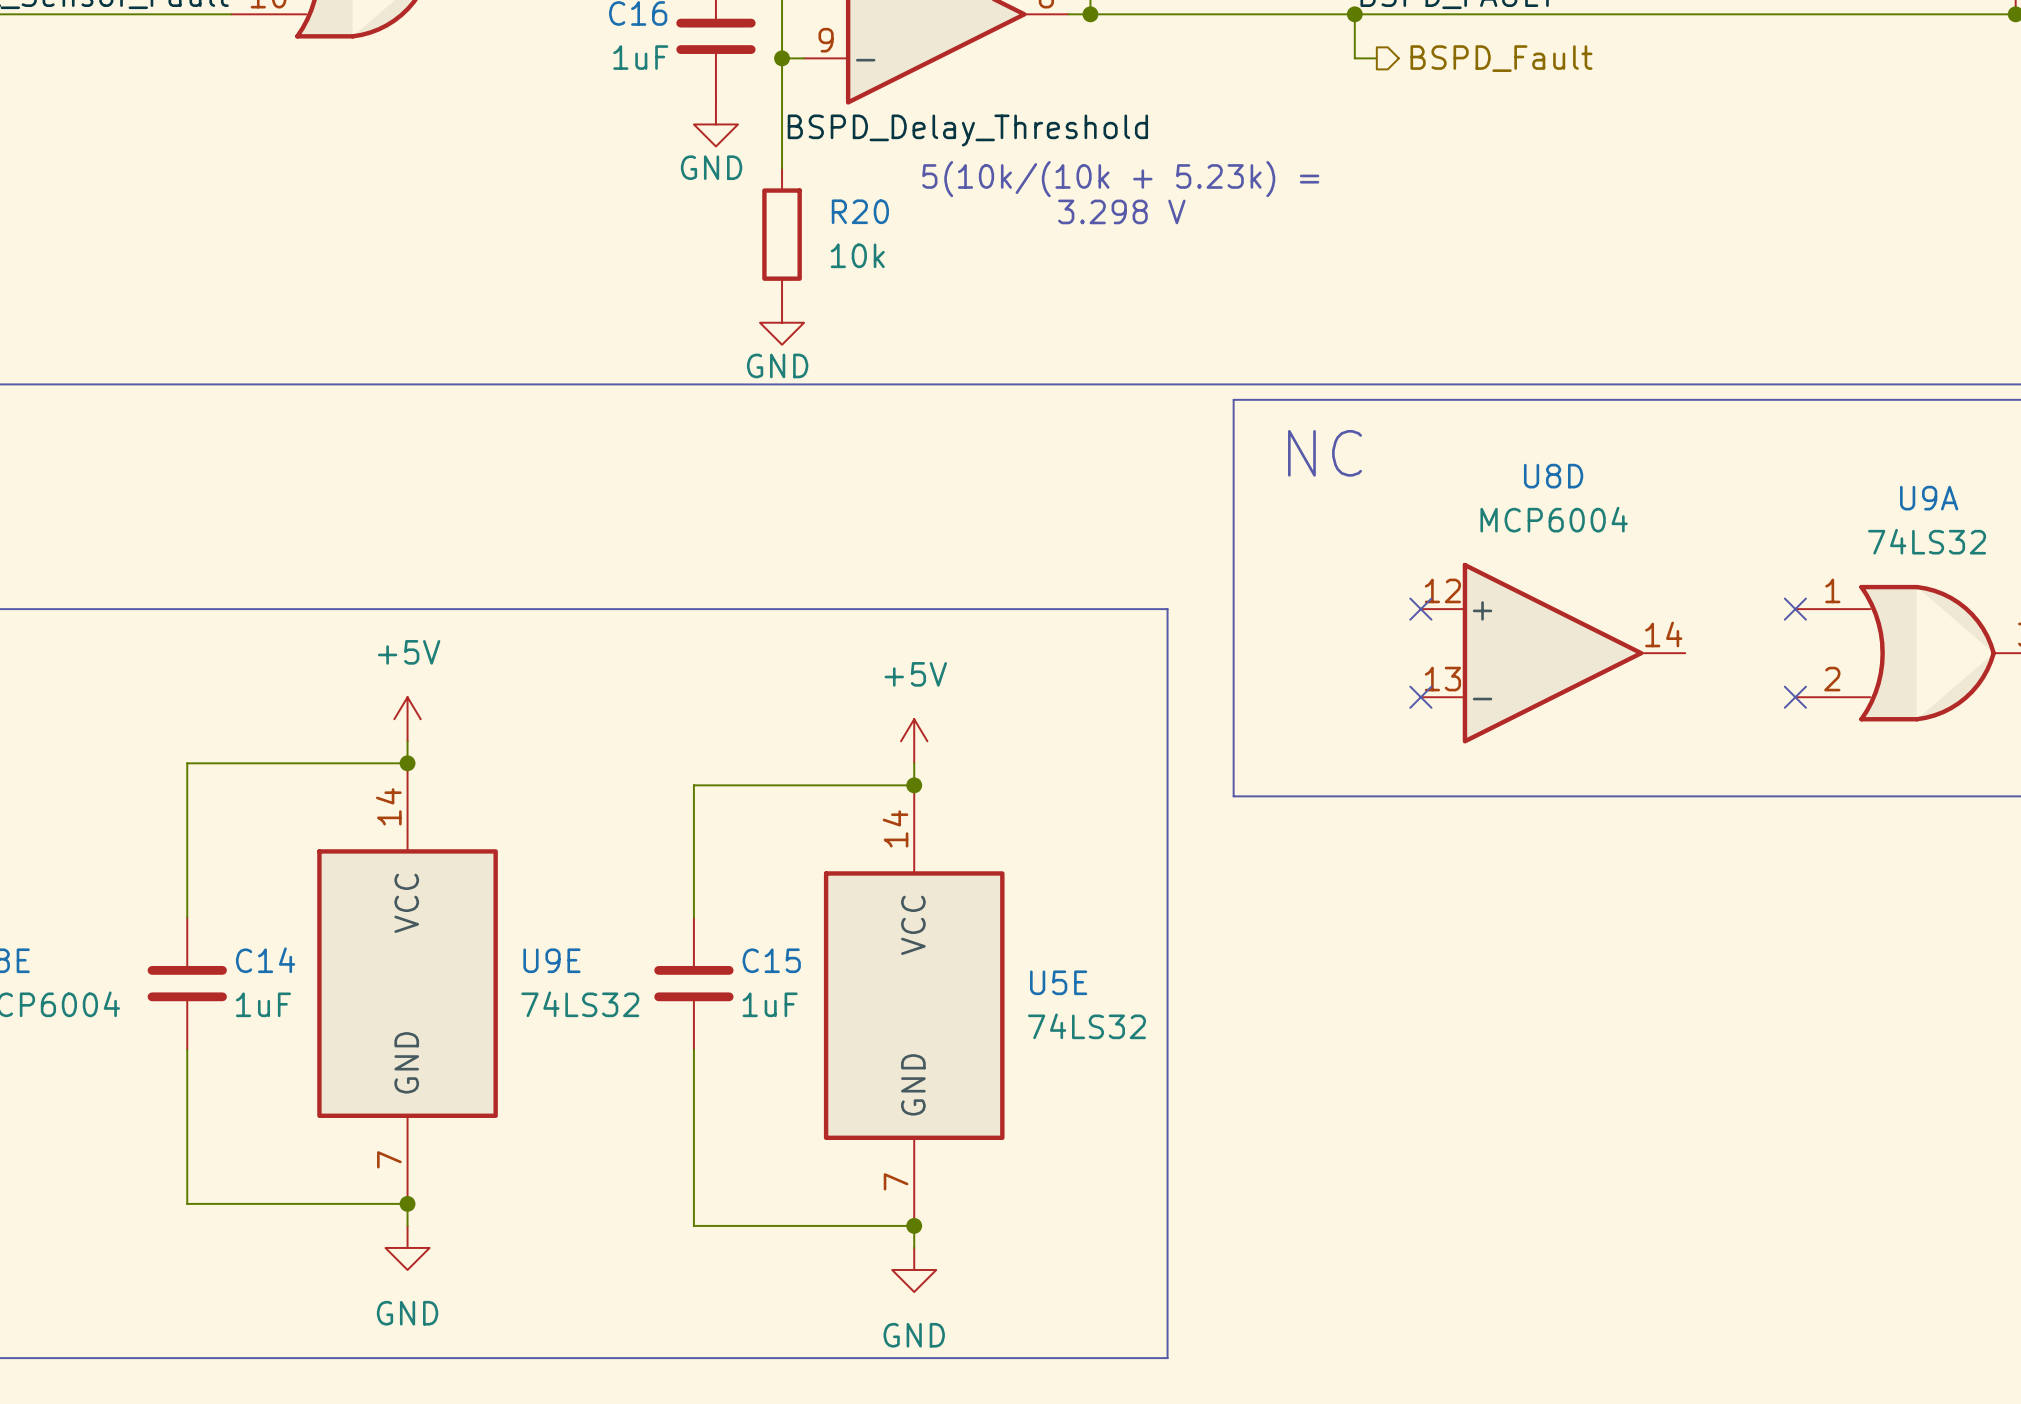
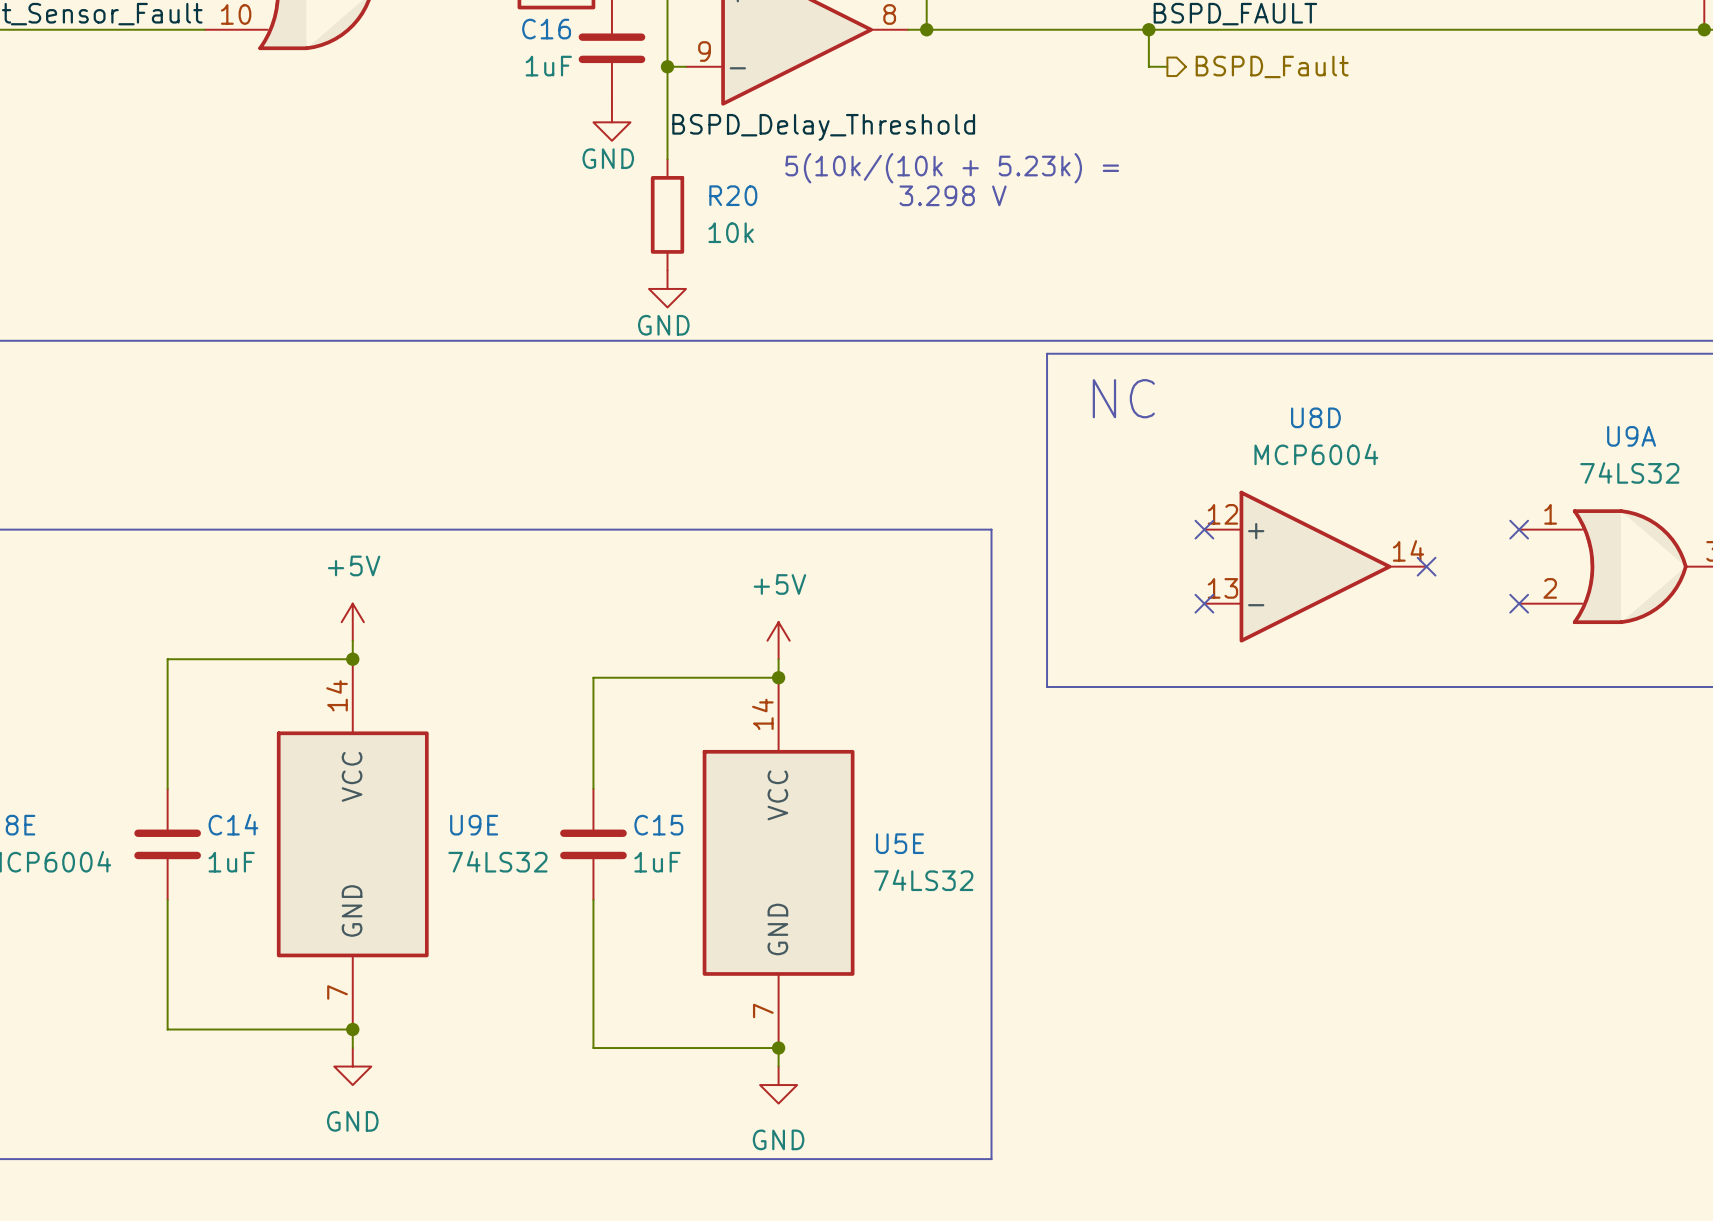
no-connect mark: none -> (1426, 566)

